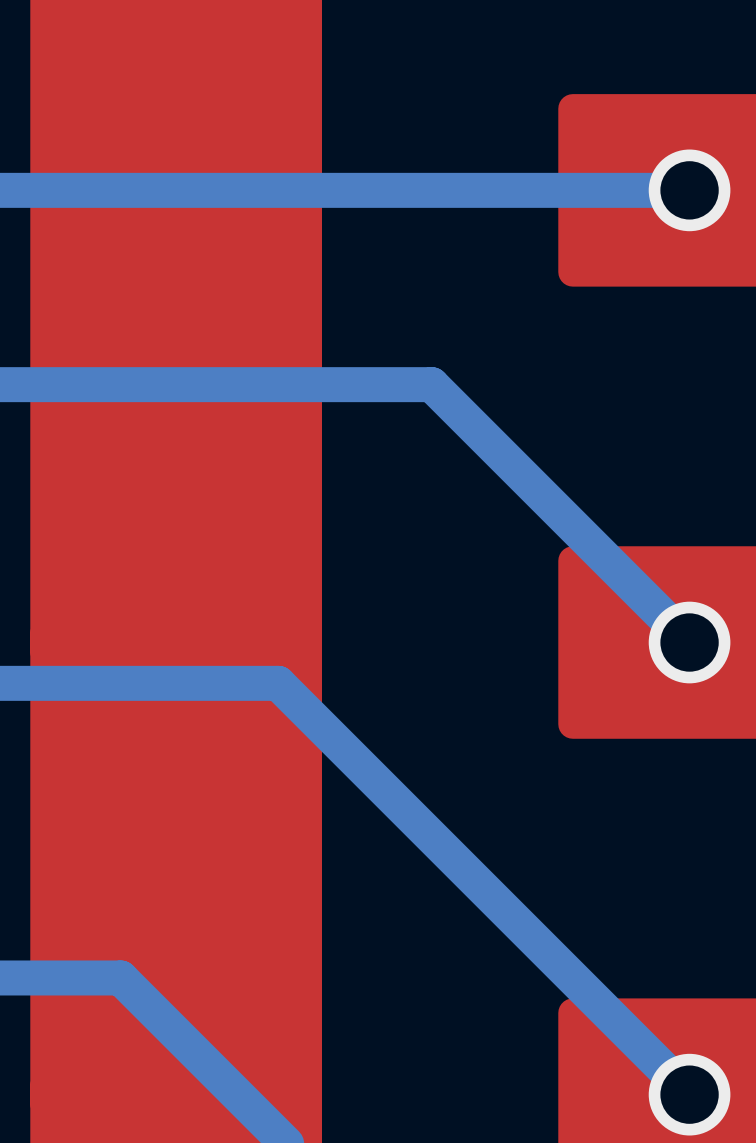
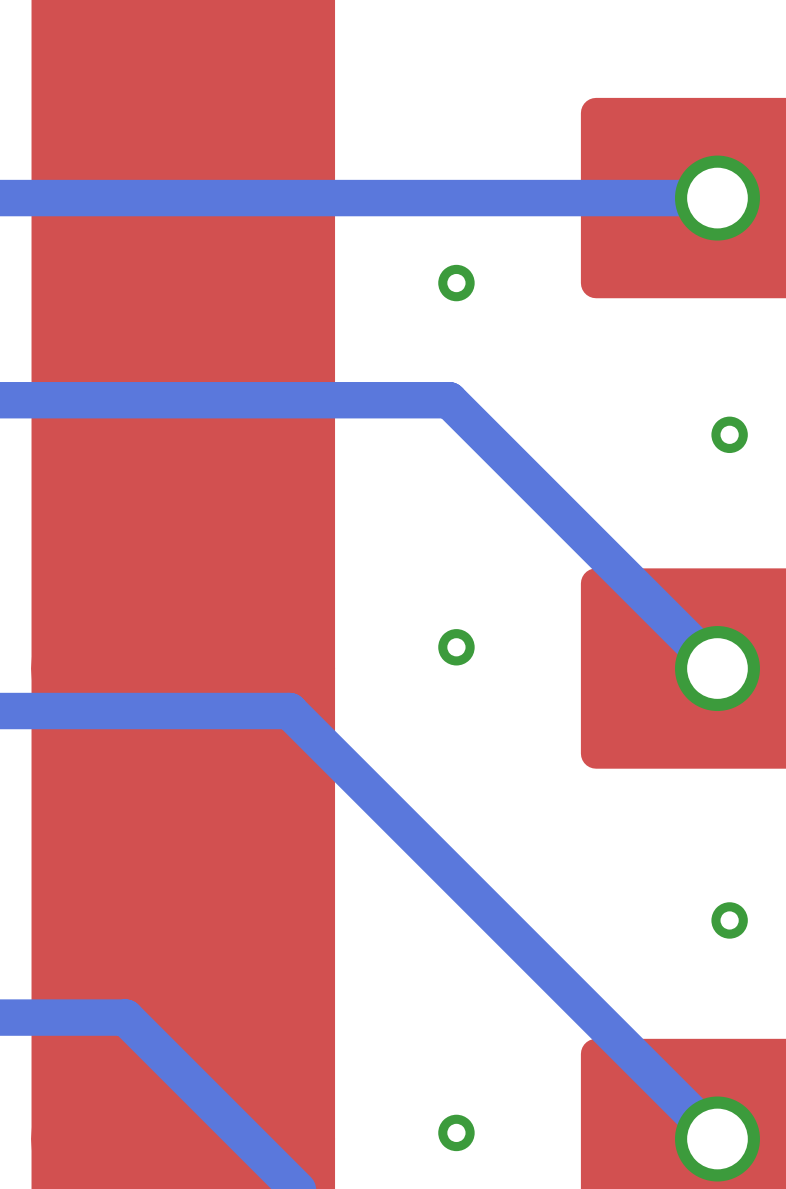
via: none -> (456, 283)
via: none -> (729, 434)
via: none -> (456, 647)
via: none -> (729, 920)
via: none -> (456, 1132)

